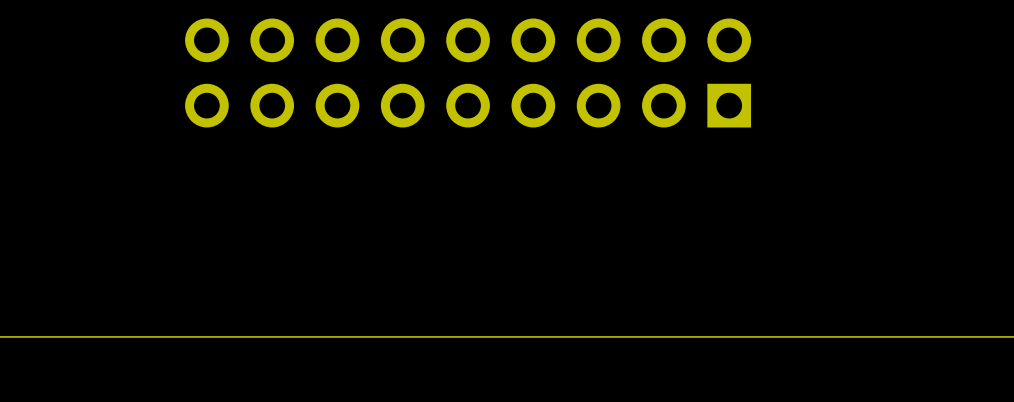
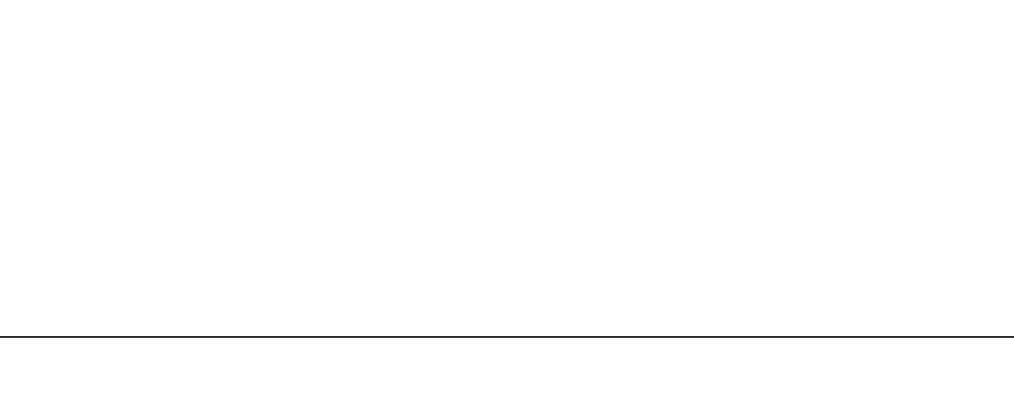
part: (468, 72) -> none

